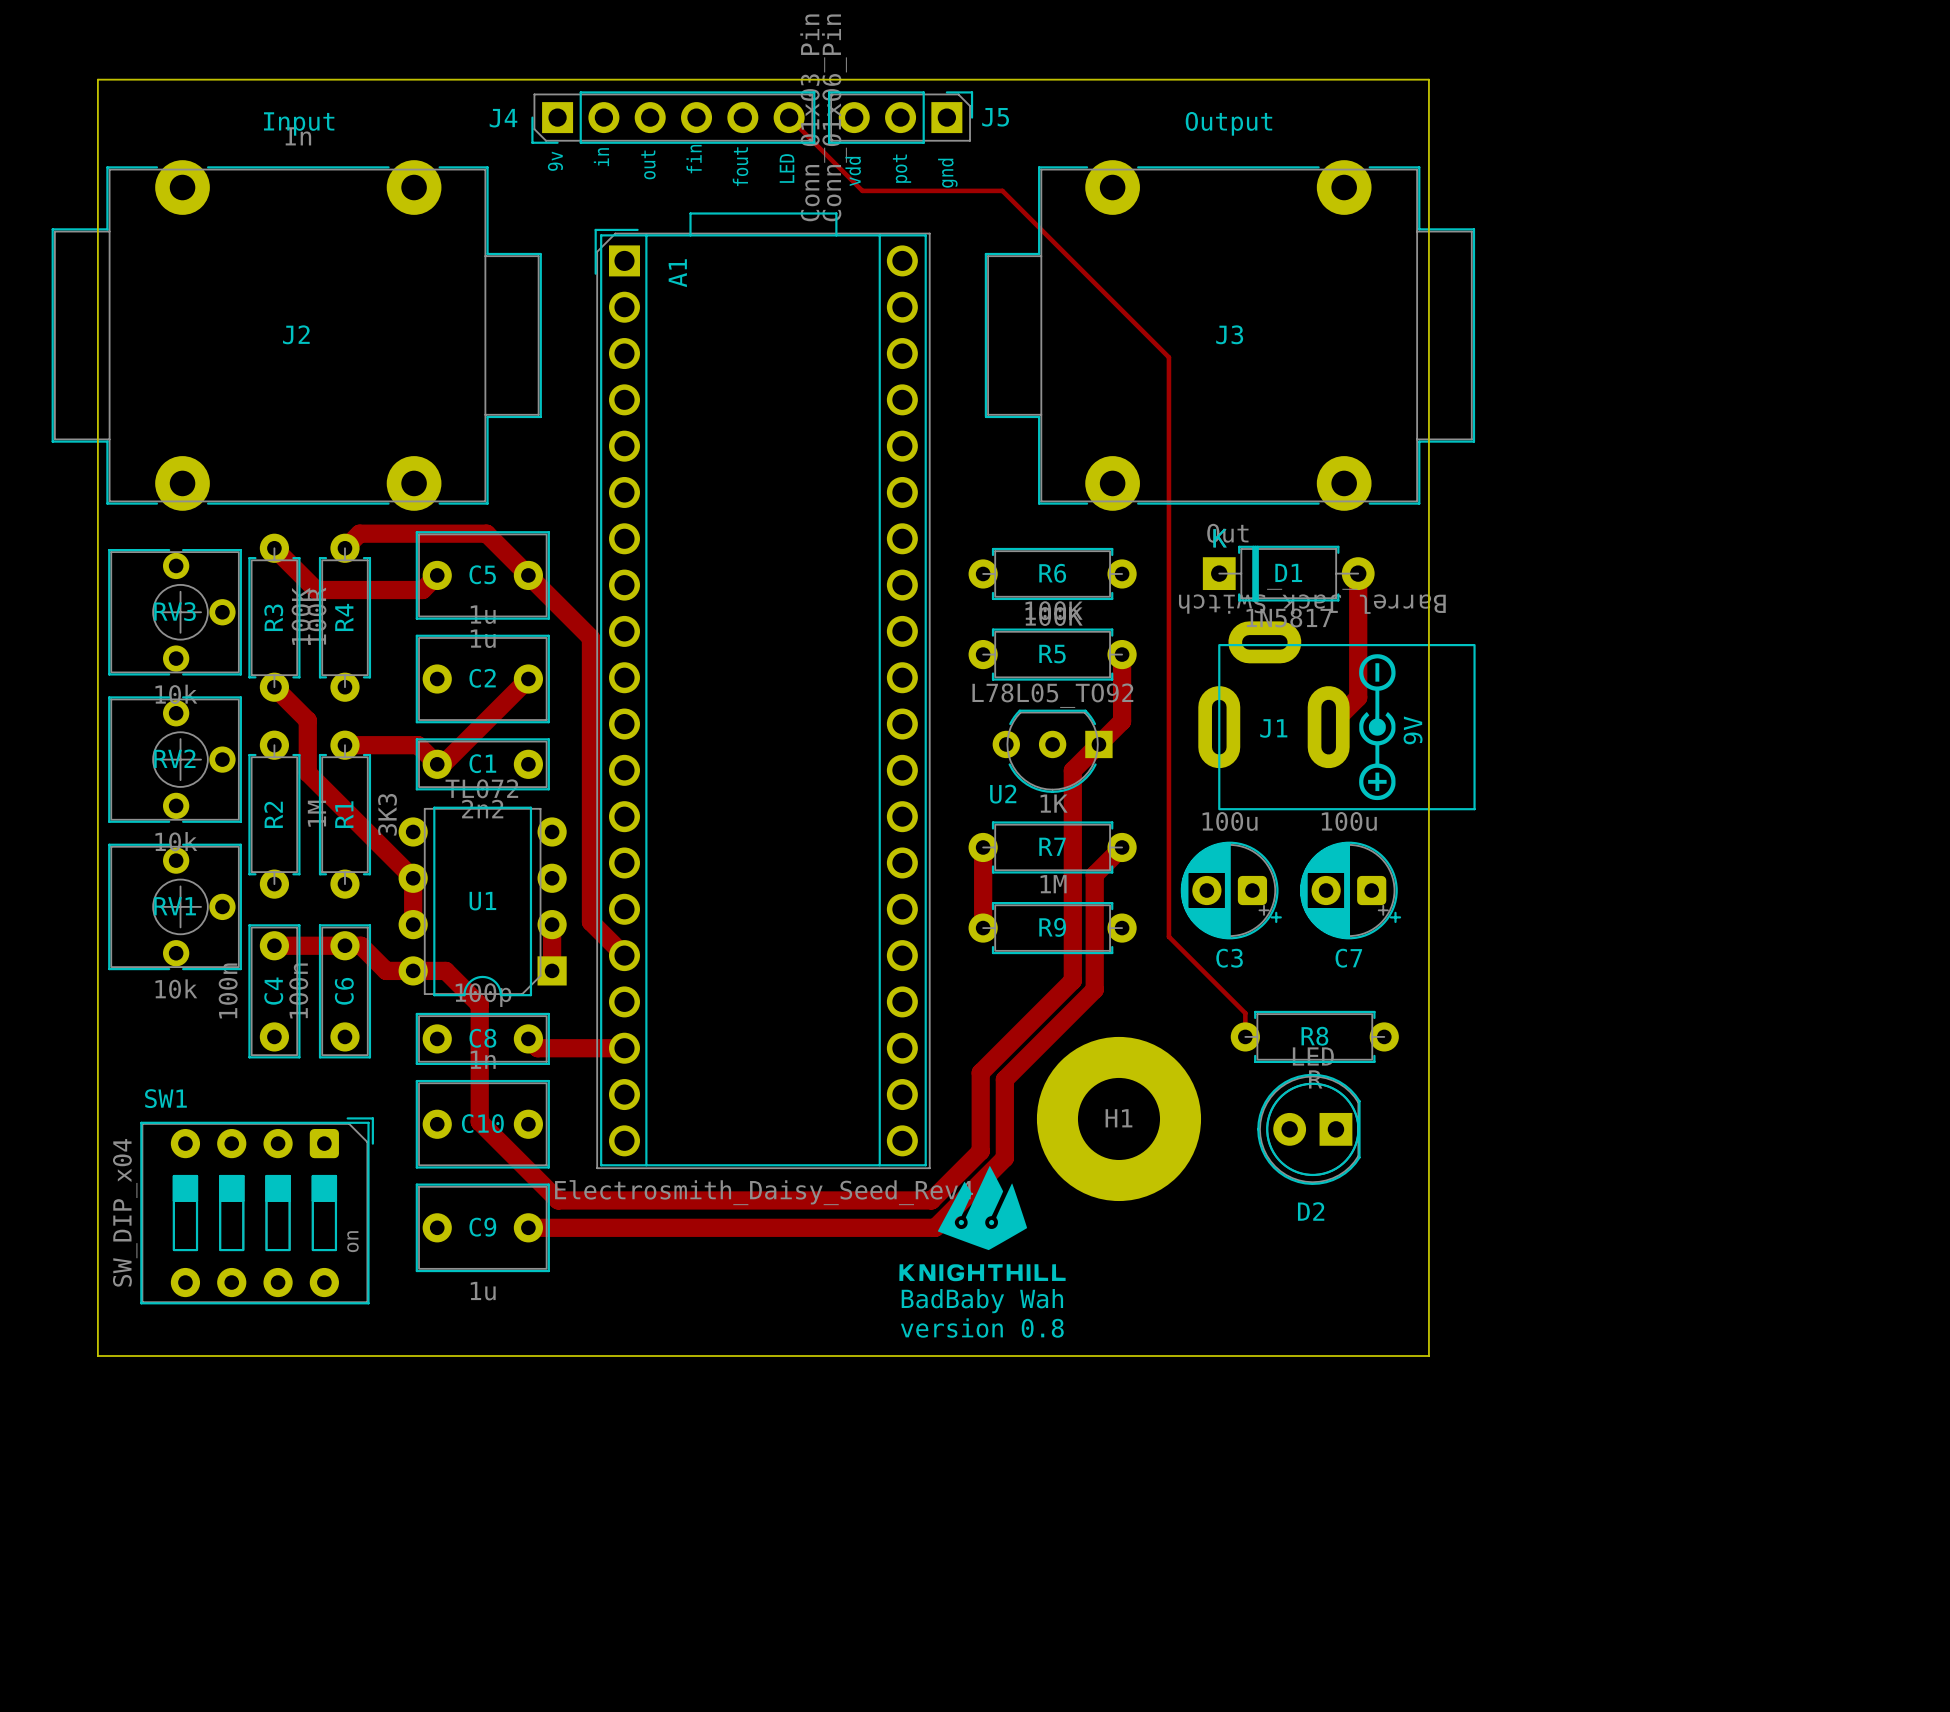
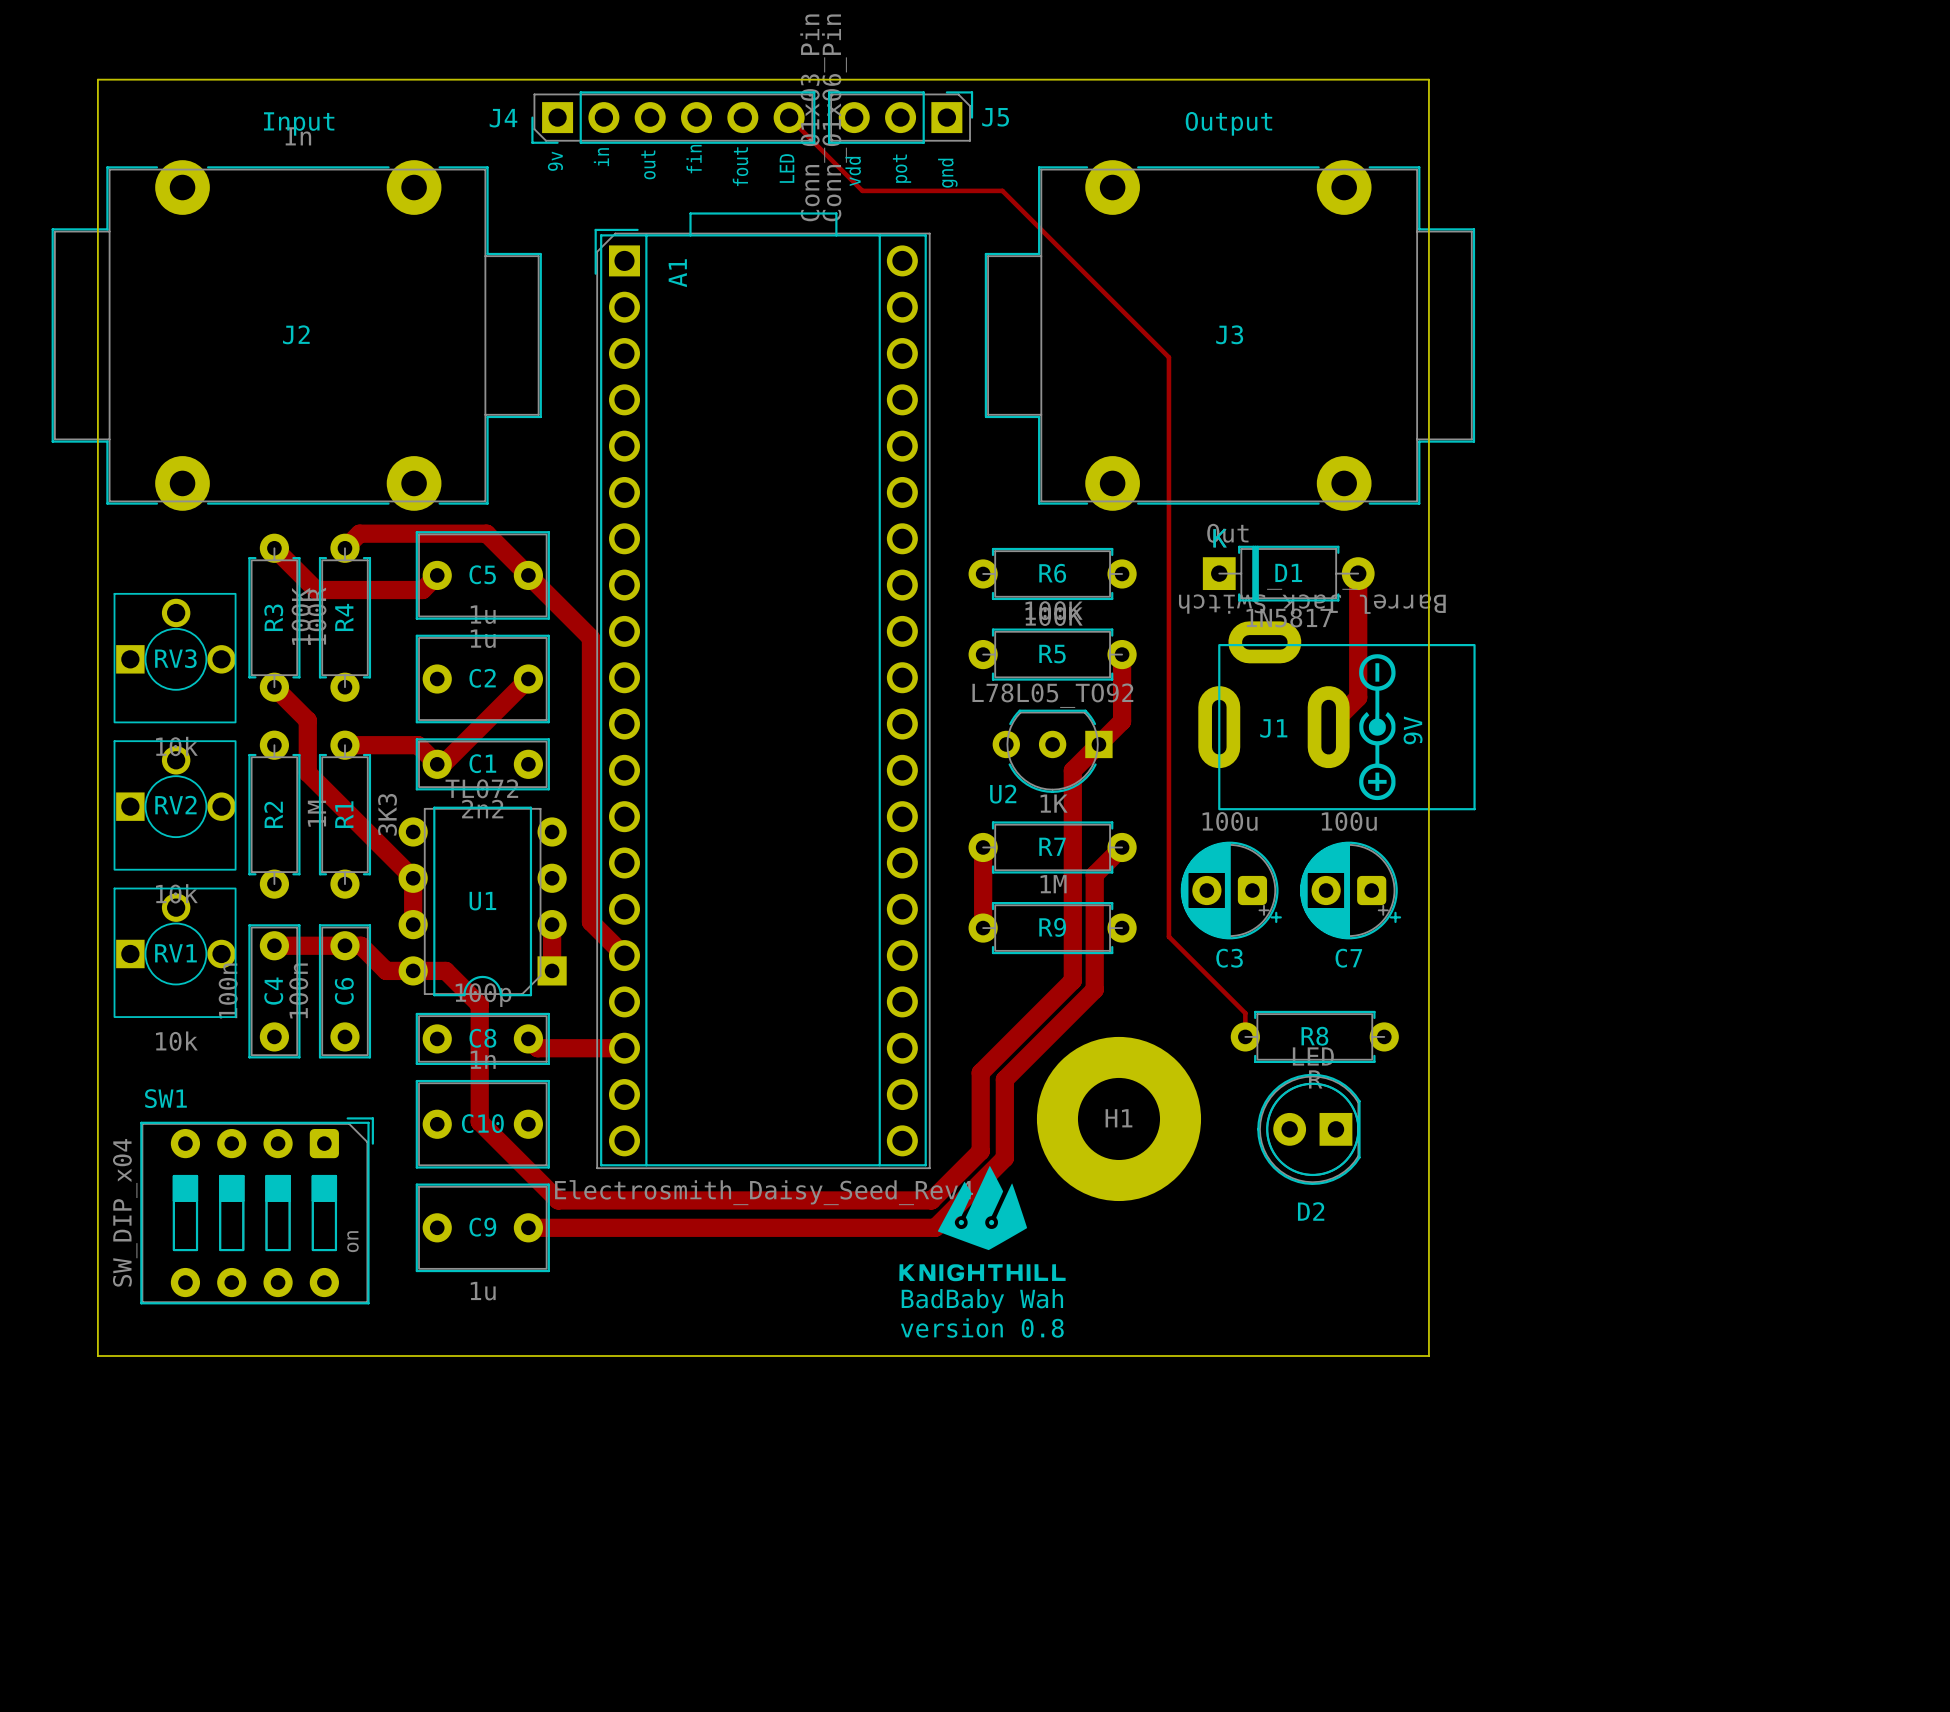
RV3 footprint: [108, 548, 242, 676] -> [113, 592, 237, 724]
RV2 footprint: [108, 696, 242, 823] -> [113, 740, 237, 871]
RV1 footprint: [108, 843, 242, 971] -> [113, 887, 237, 1018]

